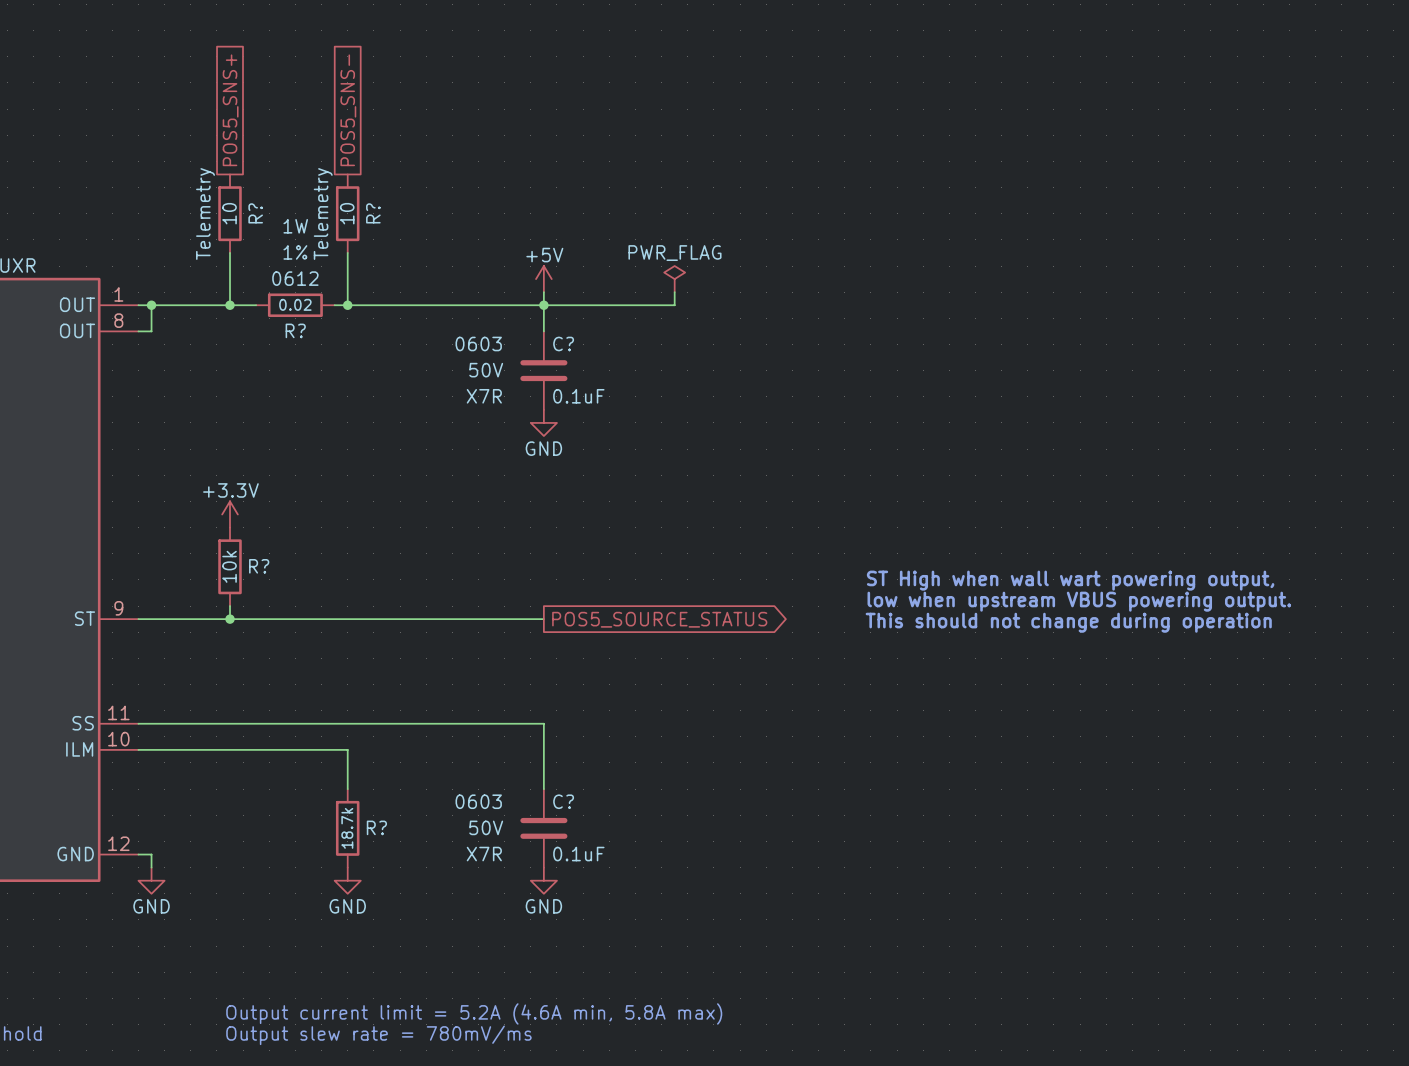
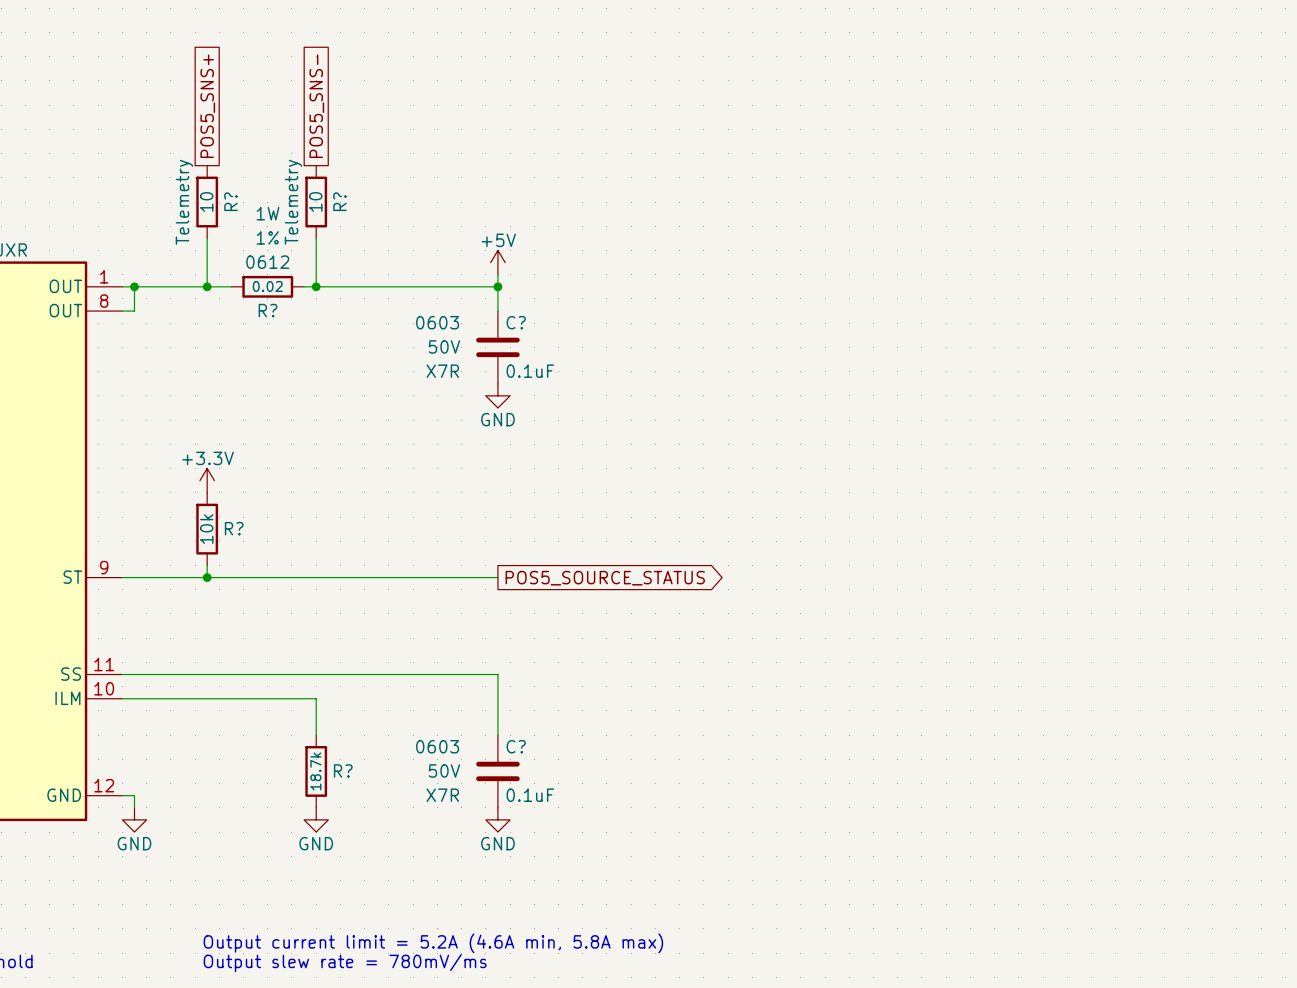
power symbol: PWR_FLAG (674, 279) -> none
wire: (674, 292) (674, 305) (543, 305) -> none
text: ST High when wall wart powering output, (1070, 580) -> none
text: low when upstream VBUS powering output. (1079, 601) -> none
text: This should not change during operation (1068, 622) -> none

